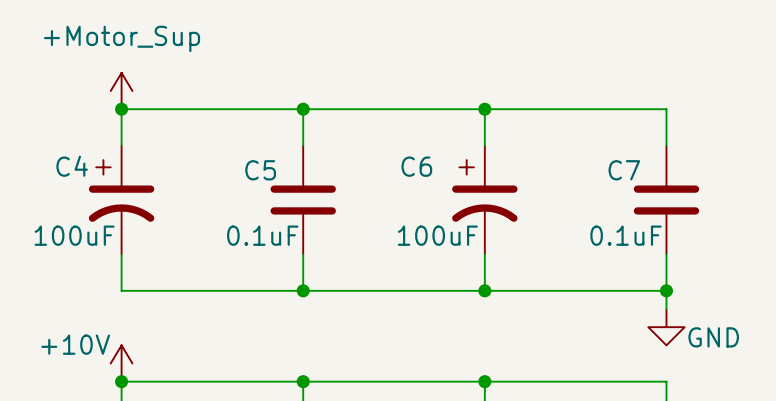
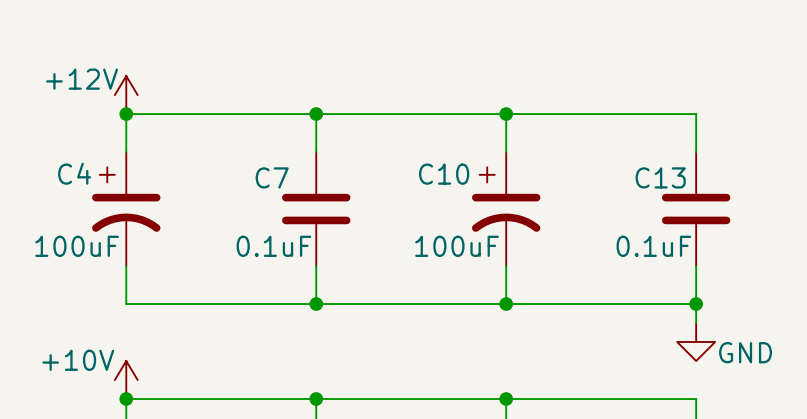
power symbol: +Motor_Sup (121, 91) -> +12V (126, 95)
C6 name: C6 (416, 166) -> C10 (444, 174)
C5 name: C5 (260, 170) -> C7 (272, 177)
C7 name: C7 (624, 170) -> C13 (660, 177)

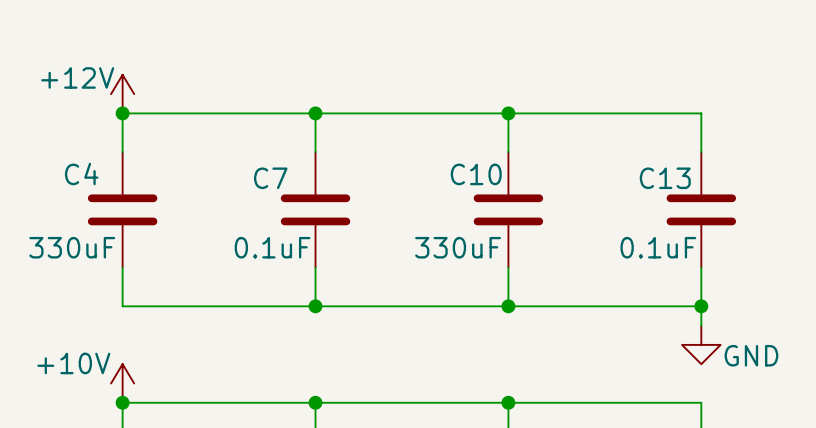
C4 symbol: [92, 152, 161, 267] -> [87, 151, 158, 268]
C10 symbol: [472, 152, 541, 267] -> [473, 151, 544, 268]
C10 name position: C10 (444, 174) -> C10 (476, 174)
C4 value: 100uF (77, 246) -> 330uF (72, 247)
C10 value: 100uF (457, 246) -> 330uF (458, 247)

